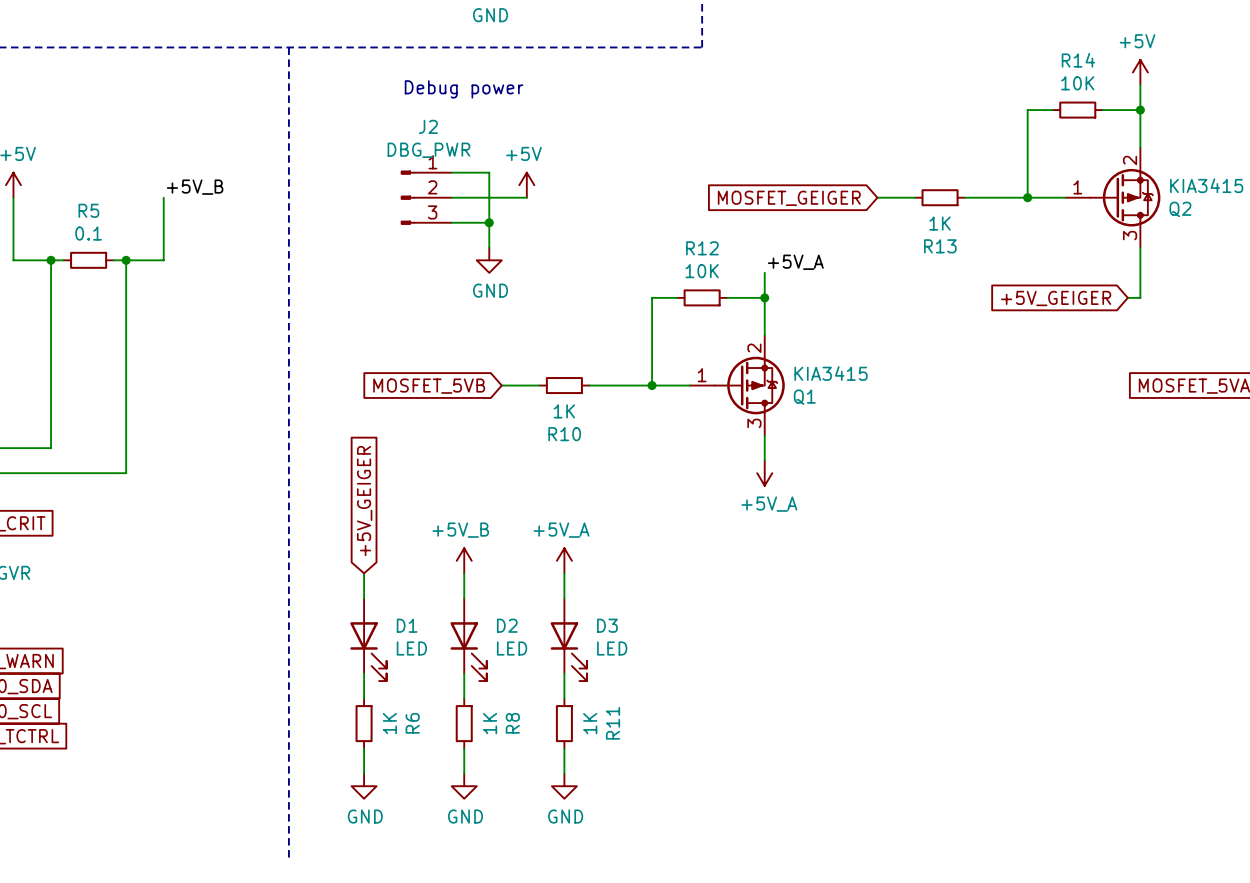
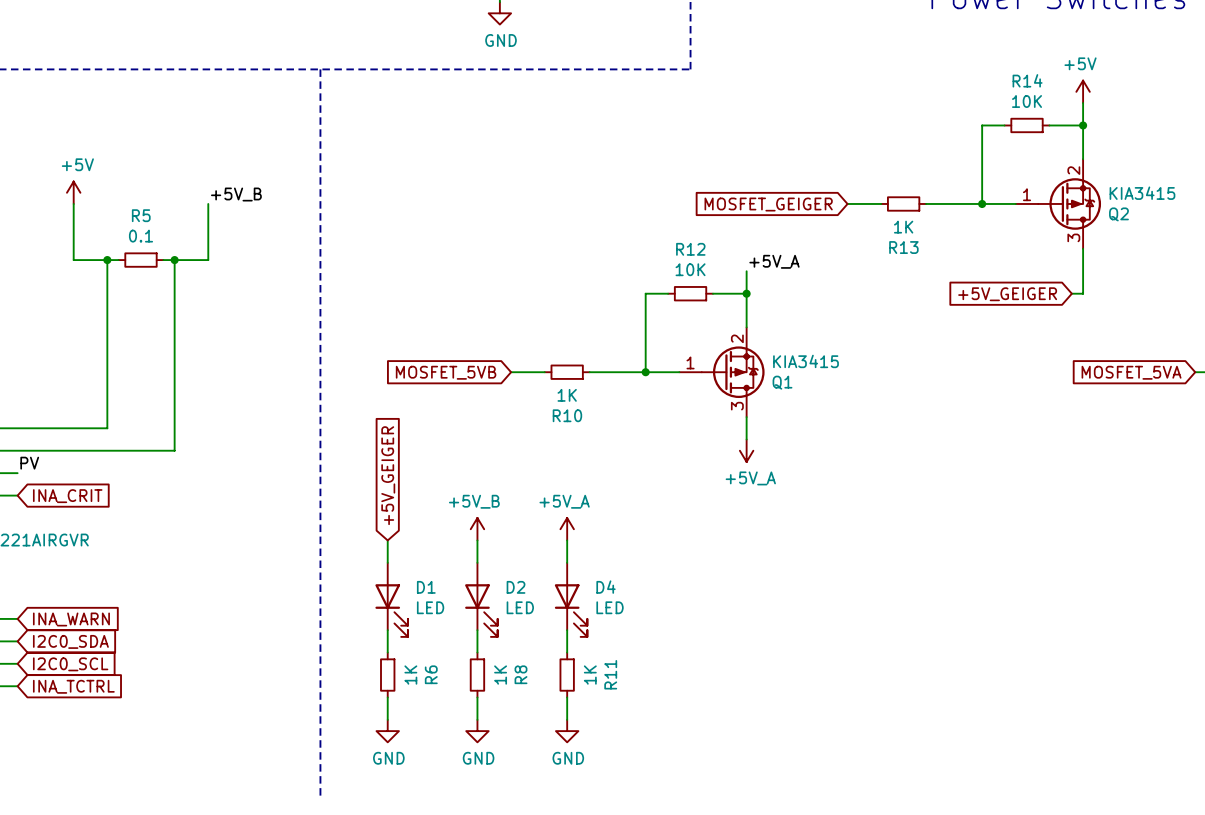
text: Debug power (464, 89) -> none
wire: (451, 172) (489, 172) (489, 247) -> none
power symbol: +5V (526, 185) -> none
J2: DBG_PWR (426, 197) -> none
wire: (451, 197) (526, 197) -> none
wire: (451, 222) (489, 222) -> none
junction: (489, 222) -> none
power symbol: GND (489, 260) -> none
D3 name: D3 (607, 625) -> D4 (606, 587)

